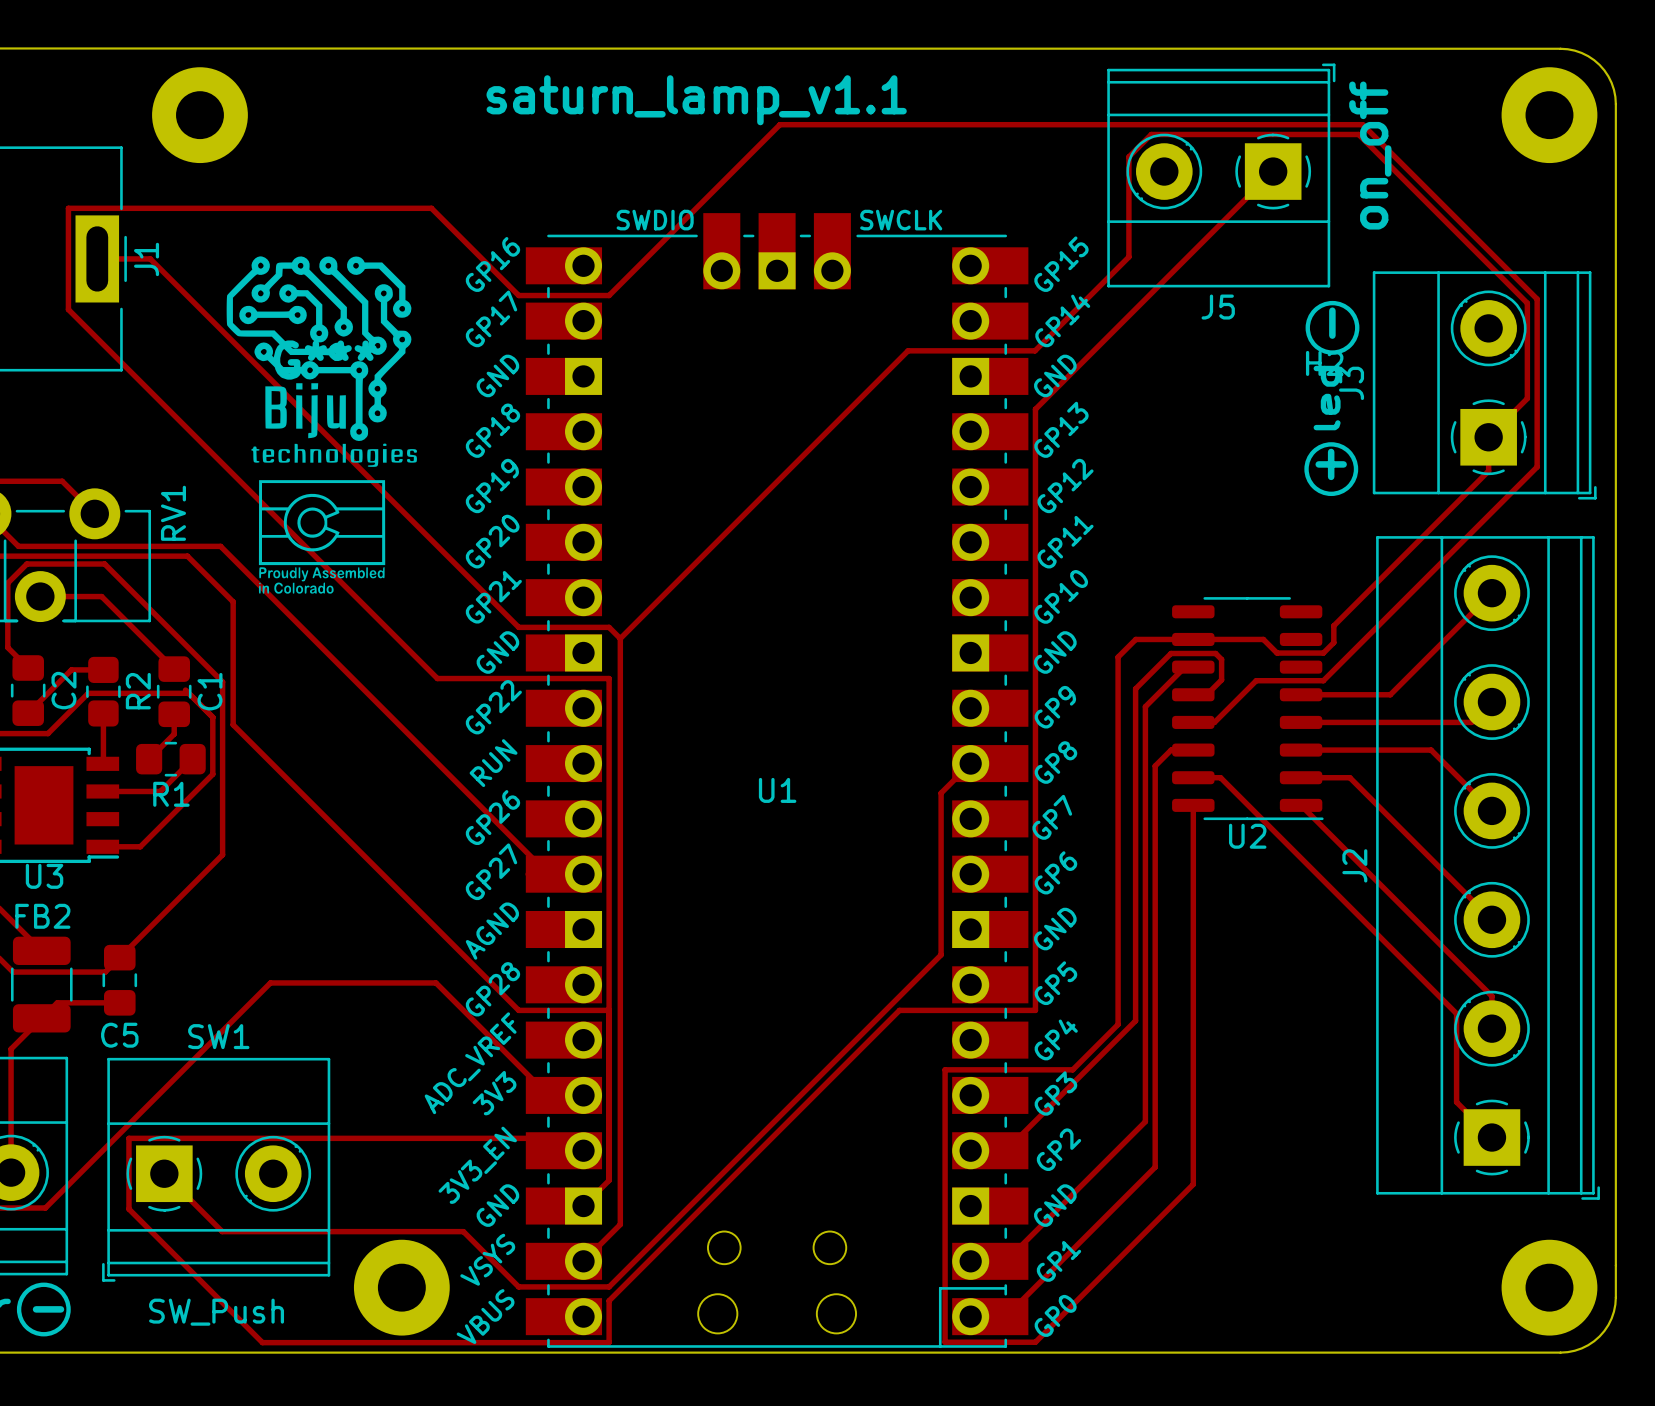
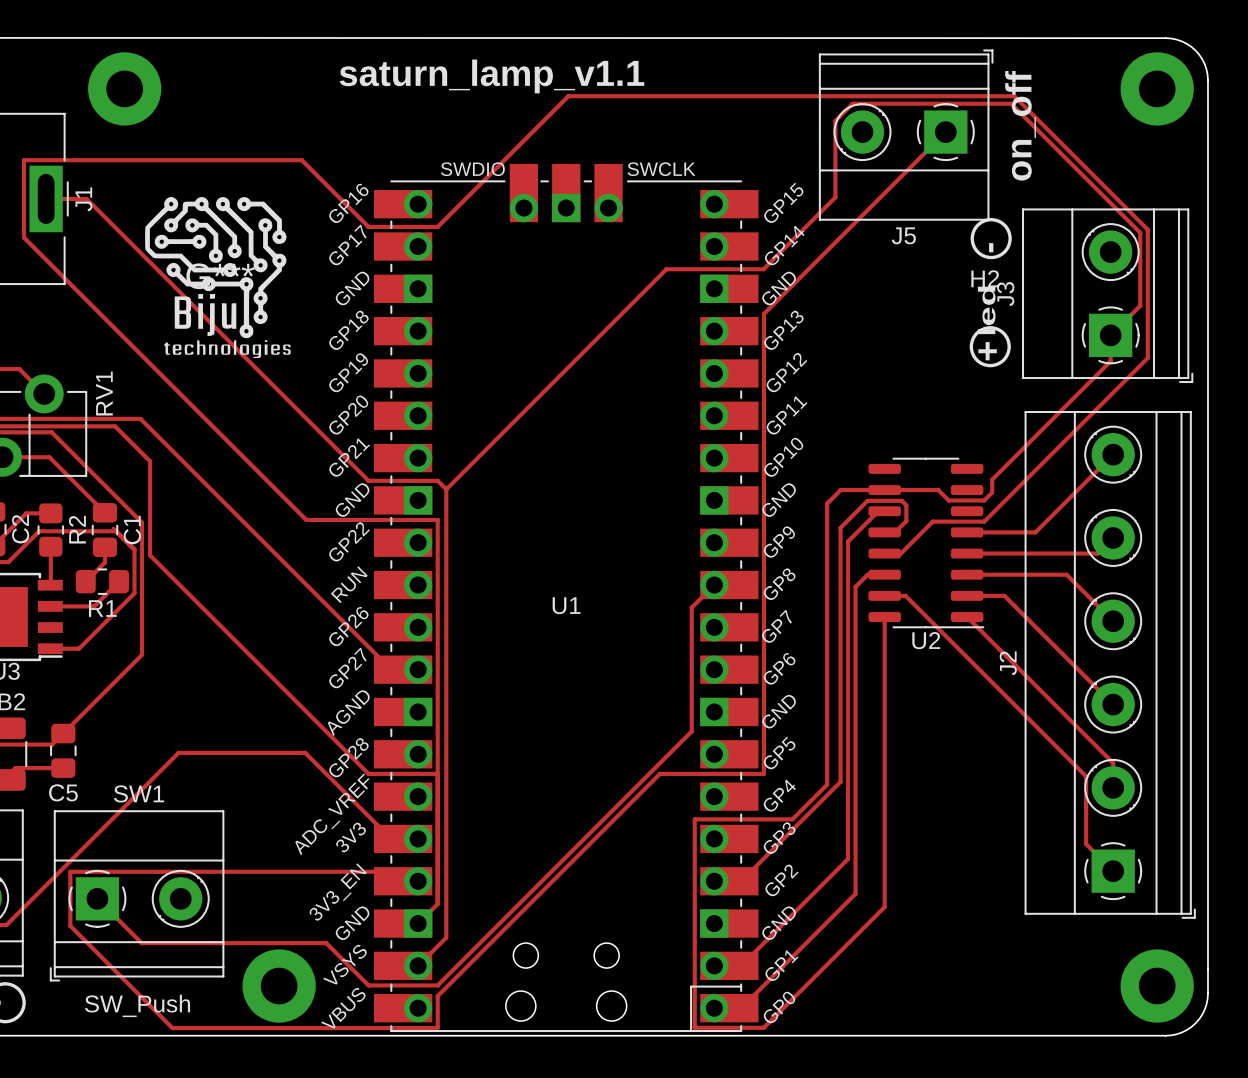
text position: - (1332, 323) -> - (991, 247)
drawing position: (1332, 327) -> (991, 238)
text position: + (1331, 464) -> + (987, 351)
drawing position: (1331, 469) -> (990, 346)
drawing: [258, 480, 386, 594] -> none

